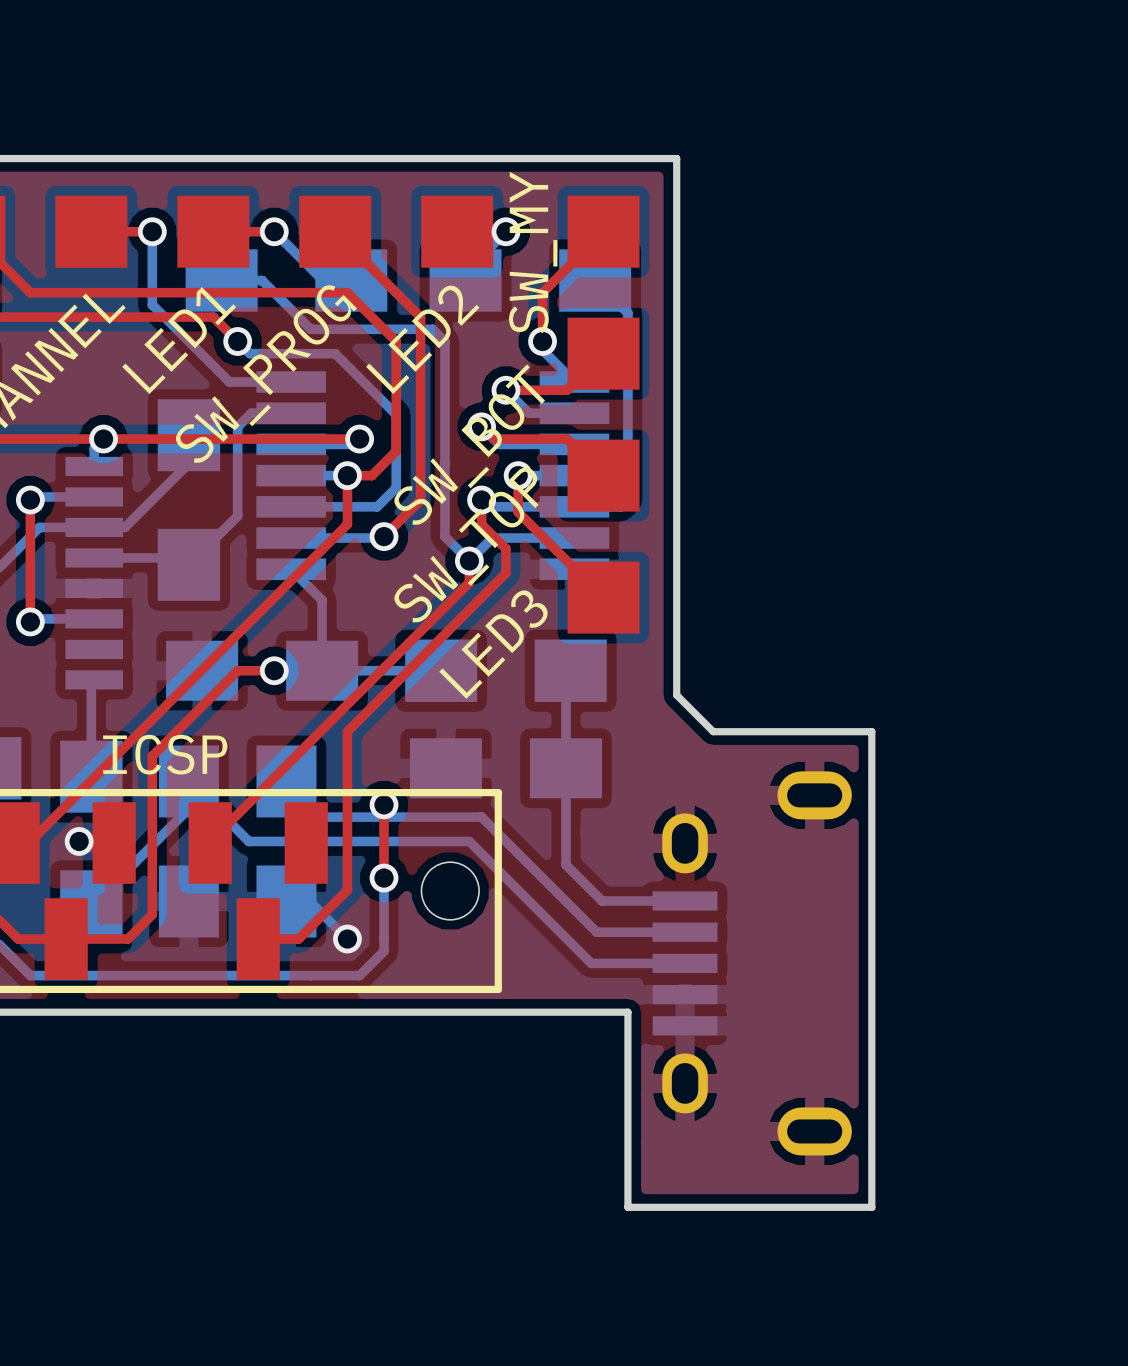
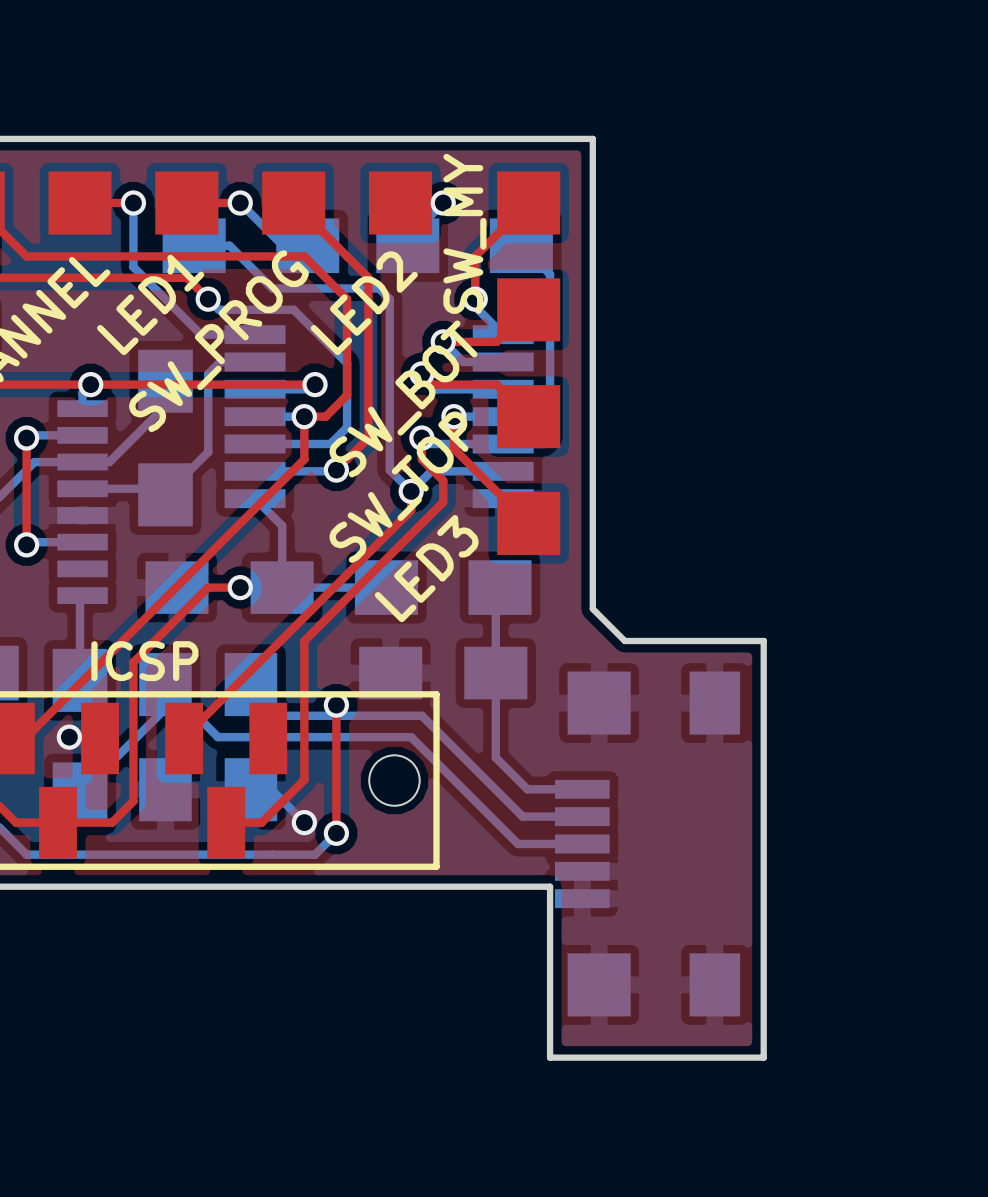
part footprint: [652, 771, 852, 1156] -> [554, 671, 741, 1017]
top track: none -> (336, 769) (336, 833)
bottom track: (384, 878) (384, 951) -> none
via position: (384, 878) -> (336, 833)

